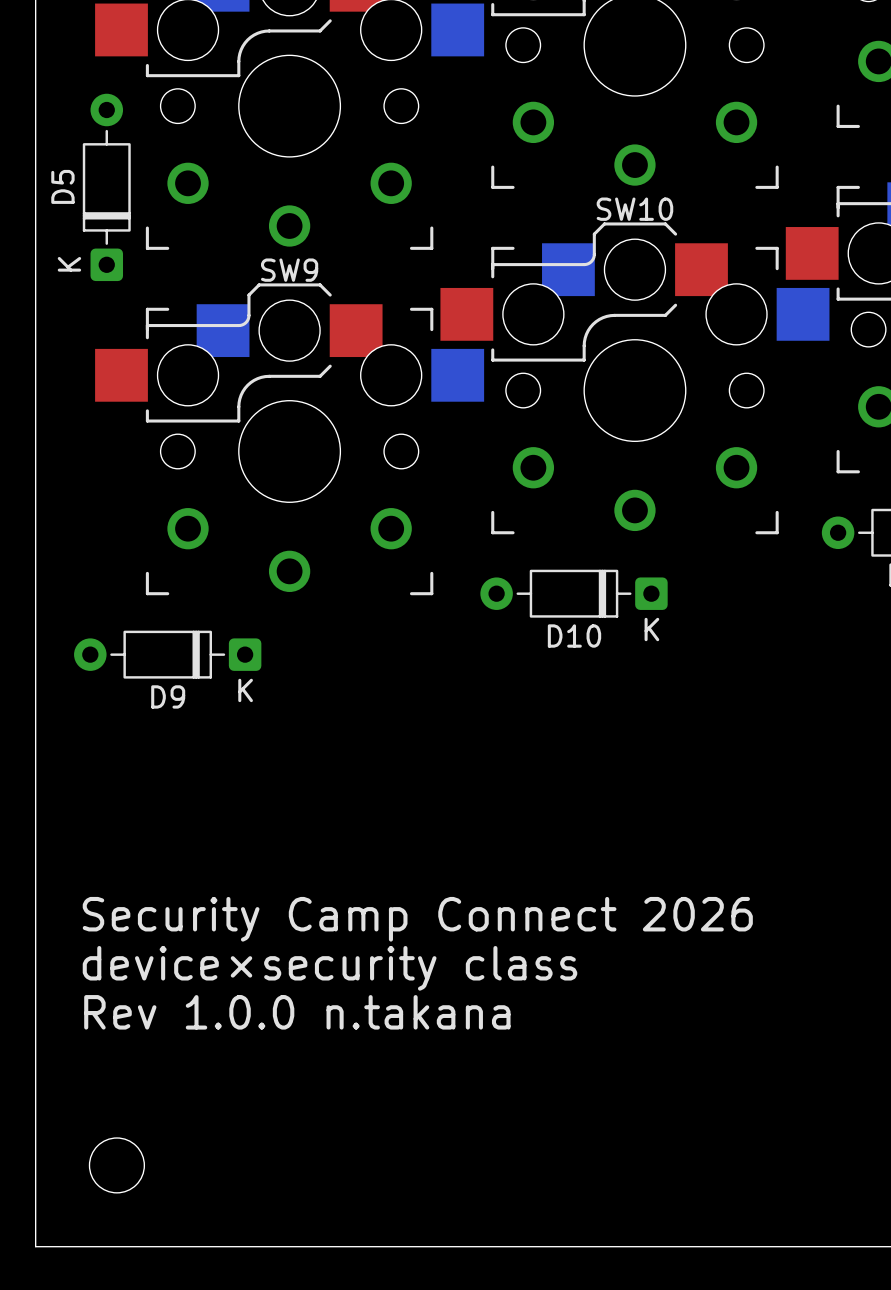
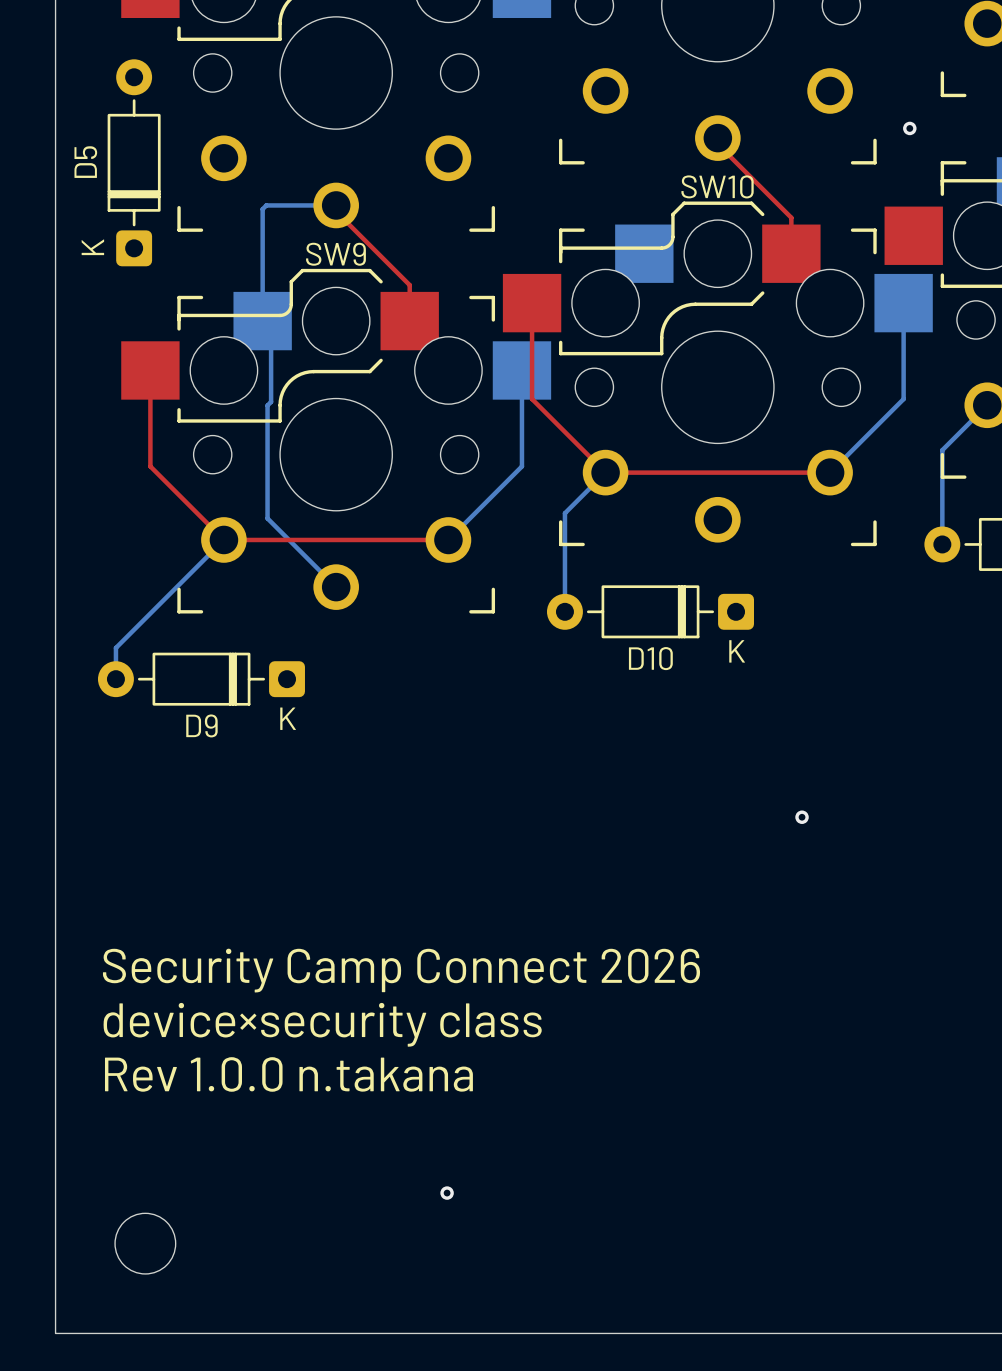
via: none -> (909, 128)
top track: none -> (717, 138) (717, 144) (791, 217) (791, 253)
top track: none -> (336, 205) (336, 211) (409, 285) (409, 321)
bottom track: none -> (336, 205) (266, 205) (262, 209) (262, 321) (271, 329) (271, 401) (267, 405) (267, 518) (336, 587)
top track: none -> (532, 303) (532, 399) (605, 472) (830, 472)
bottom track: none -> (903, 303) (903, 399) (830, 472)
top track: none -> (150, 370) (150, 466) (223, 539) (448, 539)
bottom track: none -> (521, 370) (521, 466) (448, 539)
bottom track: none -> (987, 405) (942, 450) (942, 544)
bottom track: none -> (605, 472) (564, 513) (564, 611)
bottom track: none -> (223, 539) (115, 647) (115, 679)
via: none -> (802, 817)
via: none -> (447, 1193)

